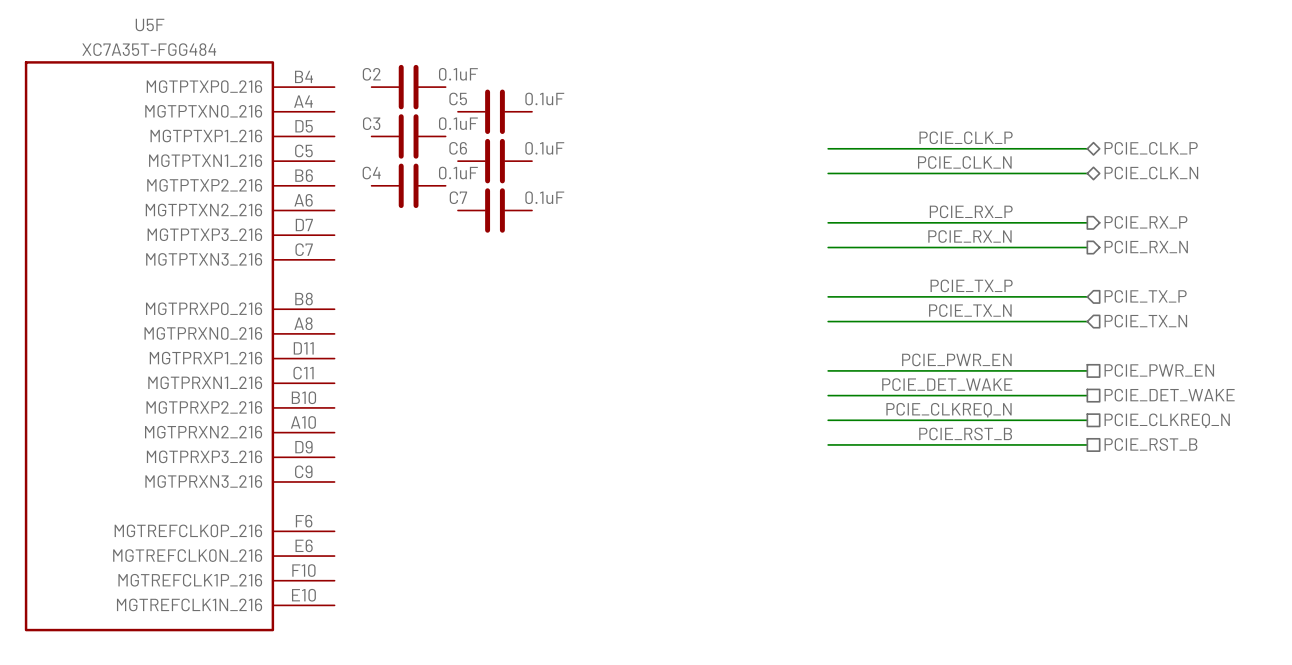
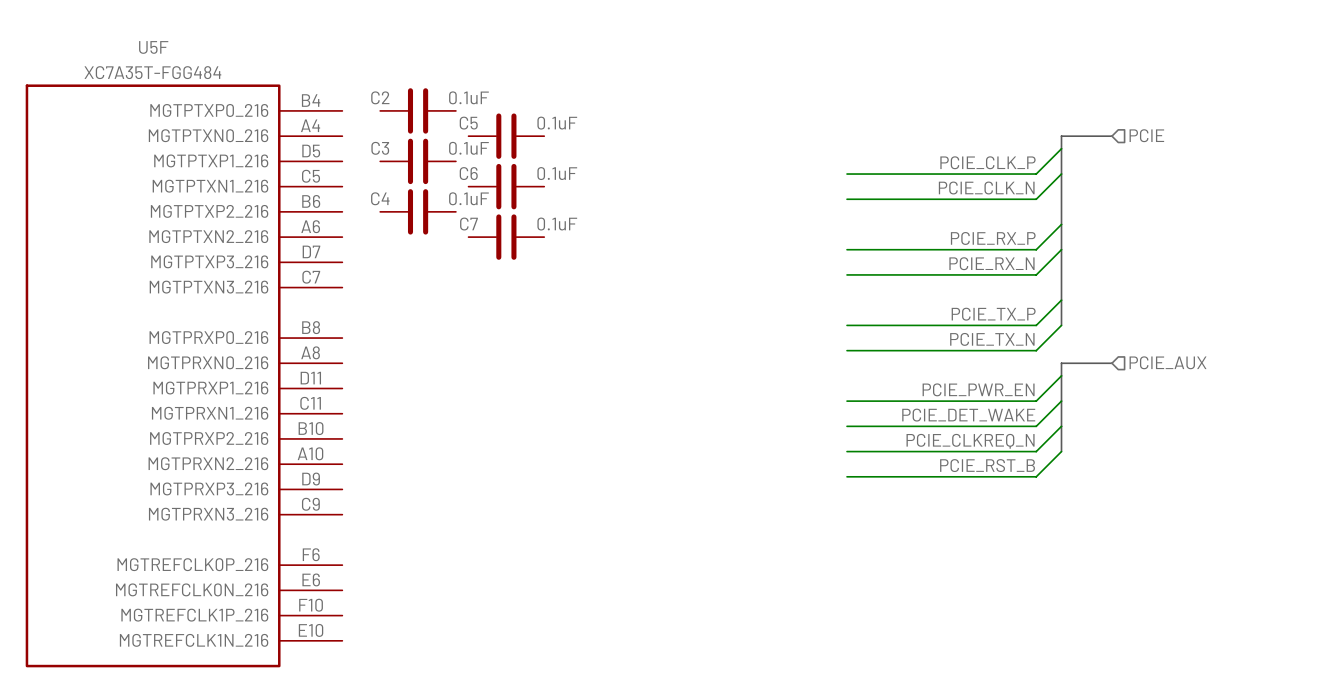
bus: none -> (1111, 136) (1061, 136) (1061, 325)
hierarchical label: none -> PCIE (1146, 135)
wire: (1013, 148) (1087, 148) -> (1036, 174) (1061, 148)
hierarchical label: PCIE_CLK_P (1151, 148) -> none
wire: (1013, 173) (1087, 173) -> (1036, 199) (1061, 174)
hierarchical label: PCIE_CLK_N (1151, 173) -> none
wire: (1013, 222) (1087, 222) -> (1036, 249) (1061, 224)
hierarchical label: PCIE_RX_P (1145, 222) -> none
wire: (1013, 247) (1087, 247) -> (1036, 274) (1061, 249)
hierarchical label: PCIE_RX_N (1146, 247) -> none
wire: (1013, 296) (1087, 296) -> (1036, 325) (1061, 300)
hierarchical label: PCIE_TX_P (1145, 296) -> none
wire: (1013, 321) (1087, 321) -> (1036, 350) (1061, 325)
hierarchical label: PCIE_TX_N (1145, 321) -> PCIE_AUX (1168, 362)
bus: none -> (1111, 363) (1061, 363) (1061, 451)
wire: (1013, 370) (1087, 370) -> (1036, 401) (1061, 375)
hierarchical label: PCIE_PWR_EN (1159, 370) -> none
wire: (1013, 395) (1087, 395) -> (1036, 426) (1061, 401)
hierarchical label: PCIE_DET_WAKE (1169, 395) -> none
wire: (1013, 420) (1087, 420) -> (1036, 451) (1061, 426)
hierarchical label: PCIE_CLKREQ_N (1167, 420) -> none
wire: (1013, 444) (1087, 444) -> (1036, 476) (1061, 451)
hierarchical label: PCIE_RST_B (1150, 444) -> none

